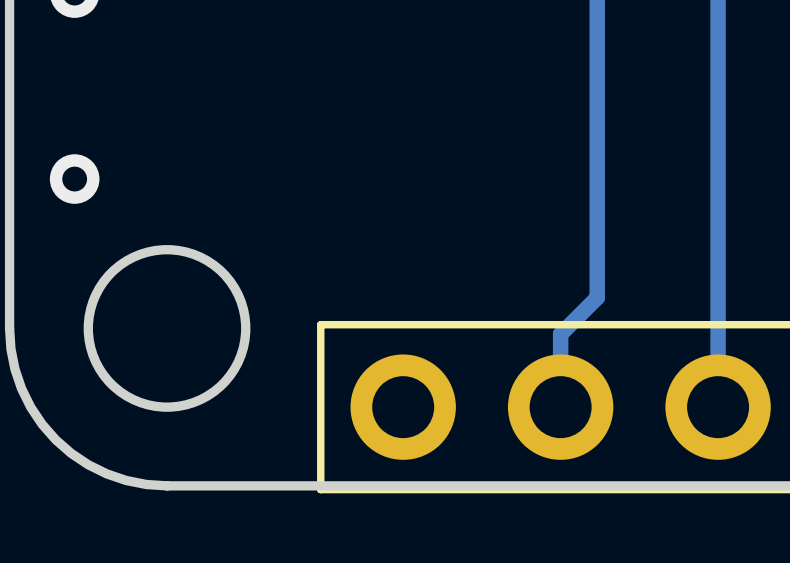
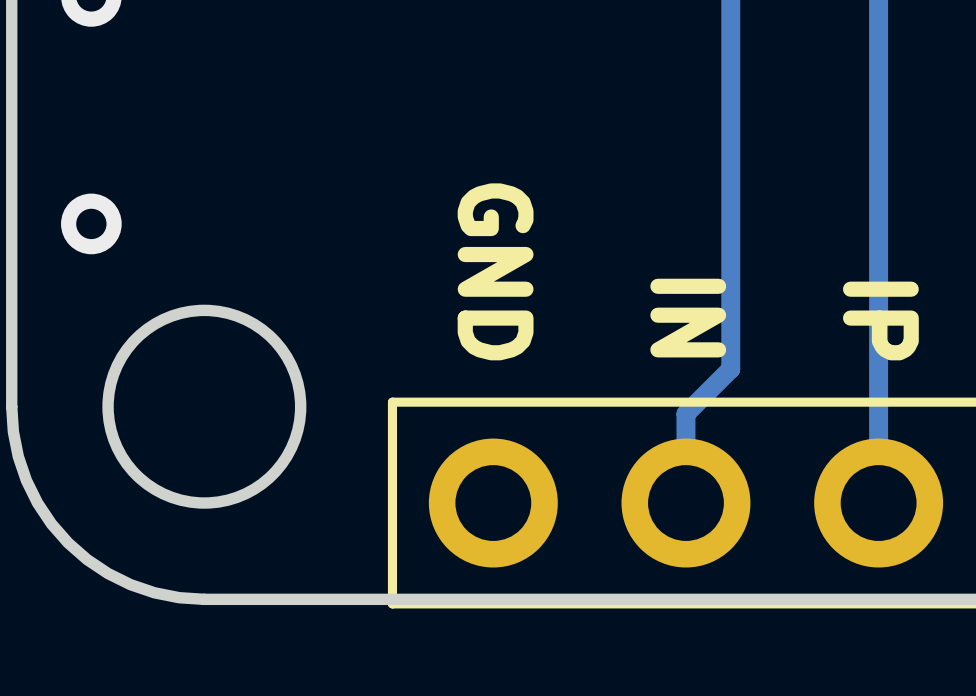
text: none -> GND (495, 271)
text: none -> IN (688, 318)
text: none -> IP (880, 320)

